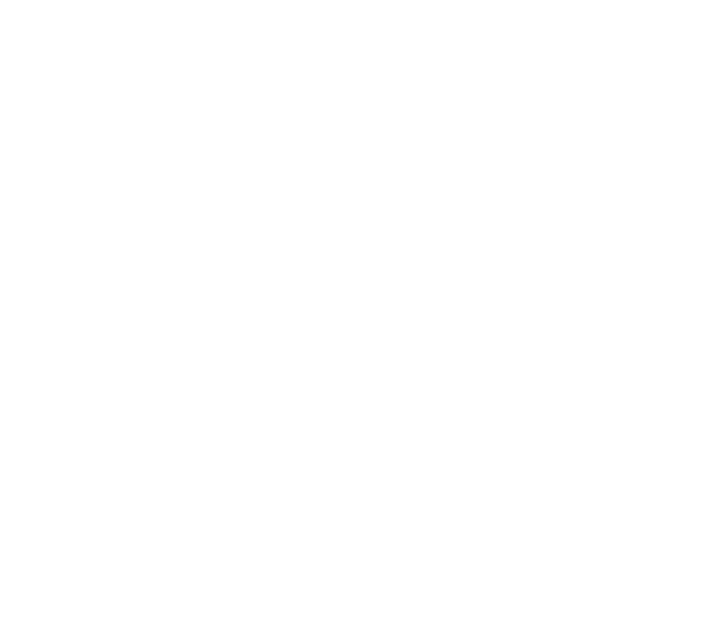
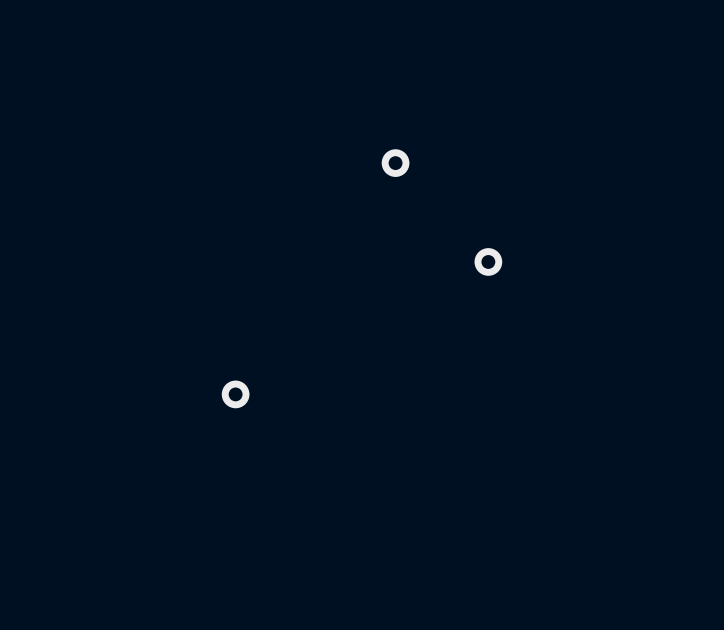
via: none -> (395, 163)
via: none -> (488, 261)
via: none -> (235, 394)

